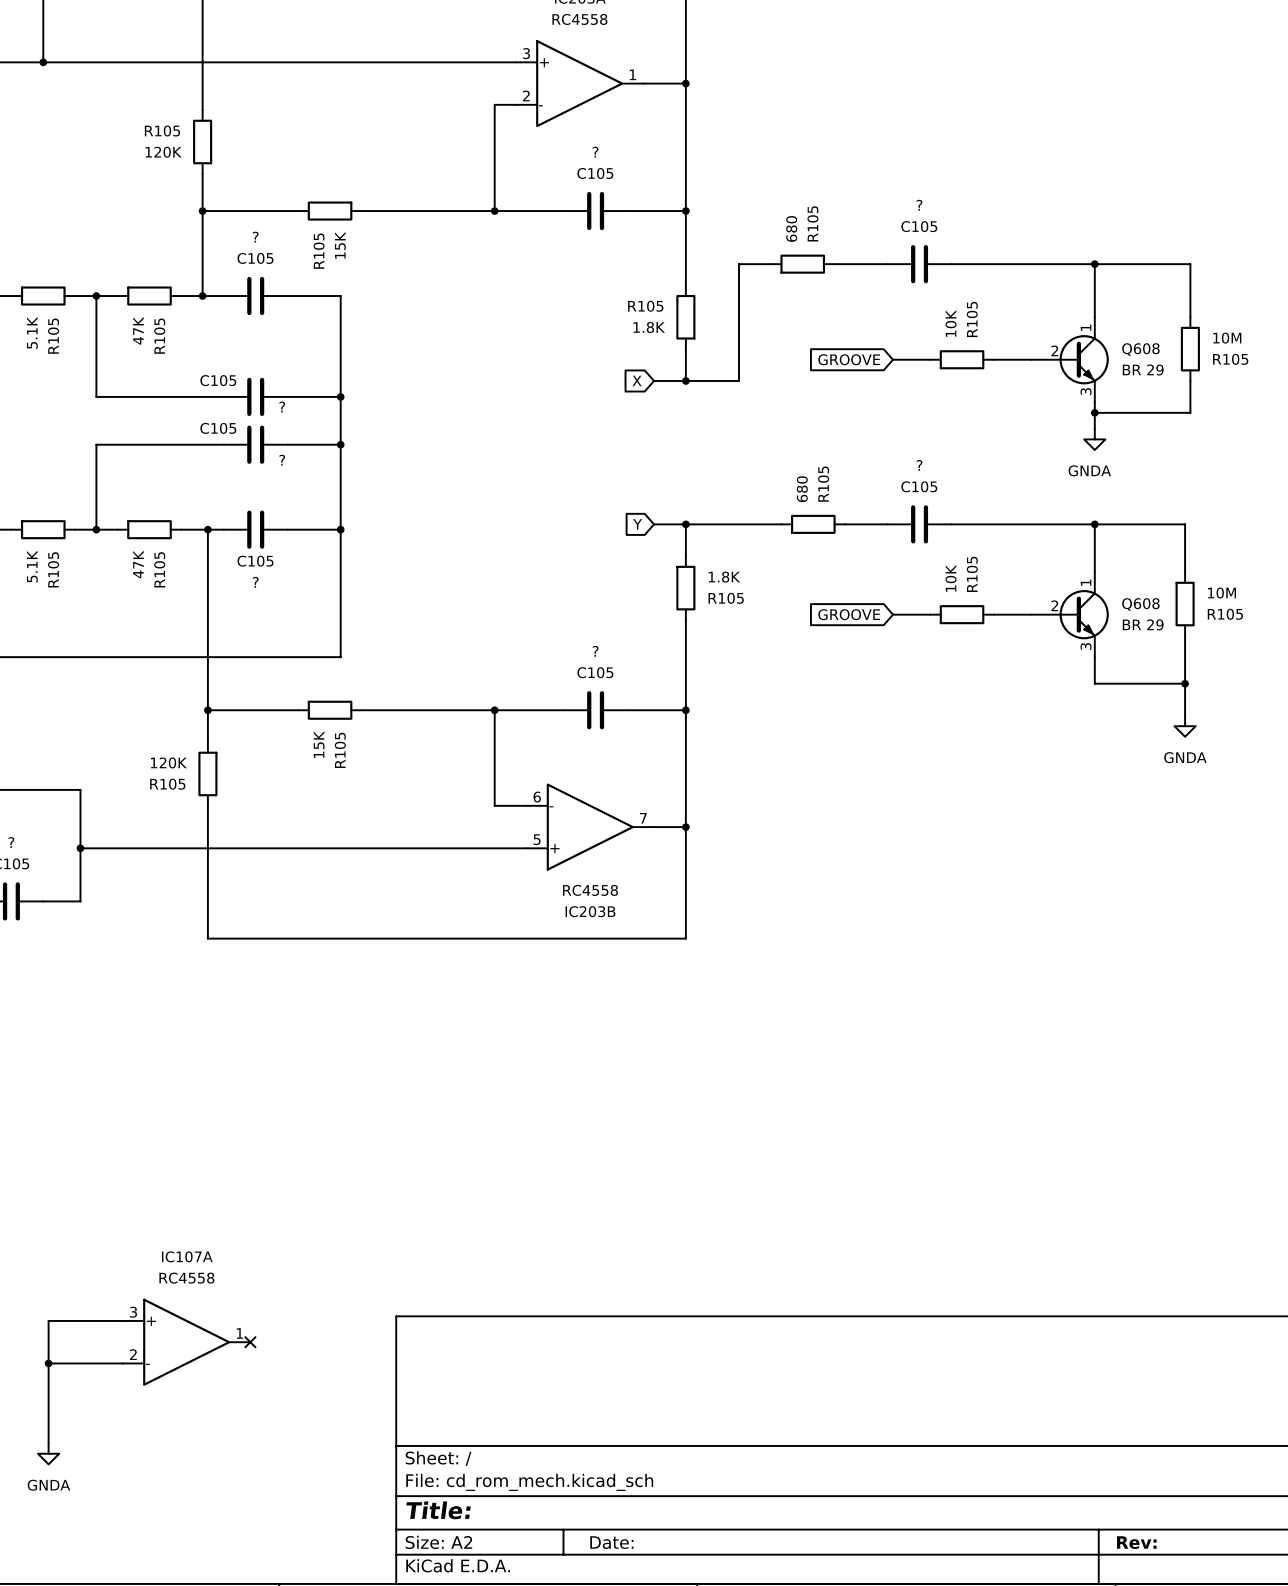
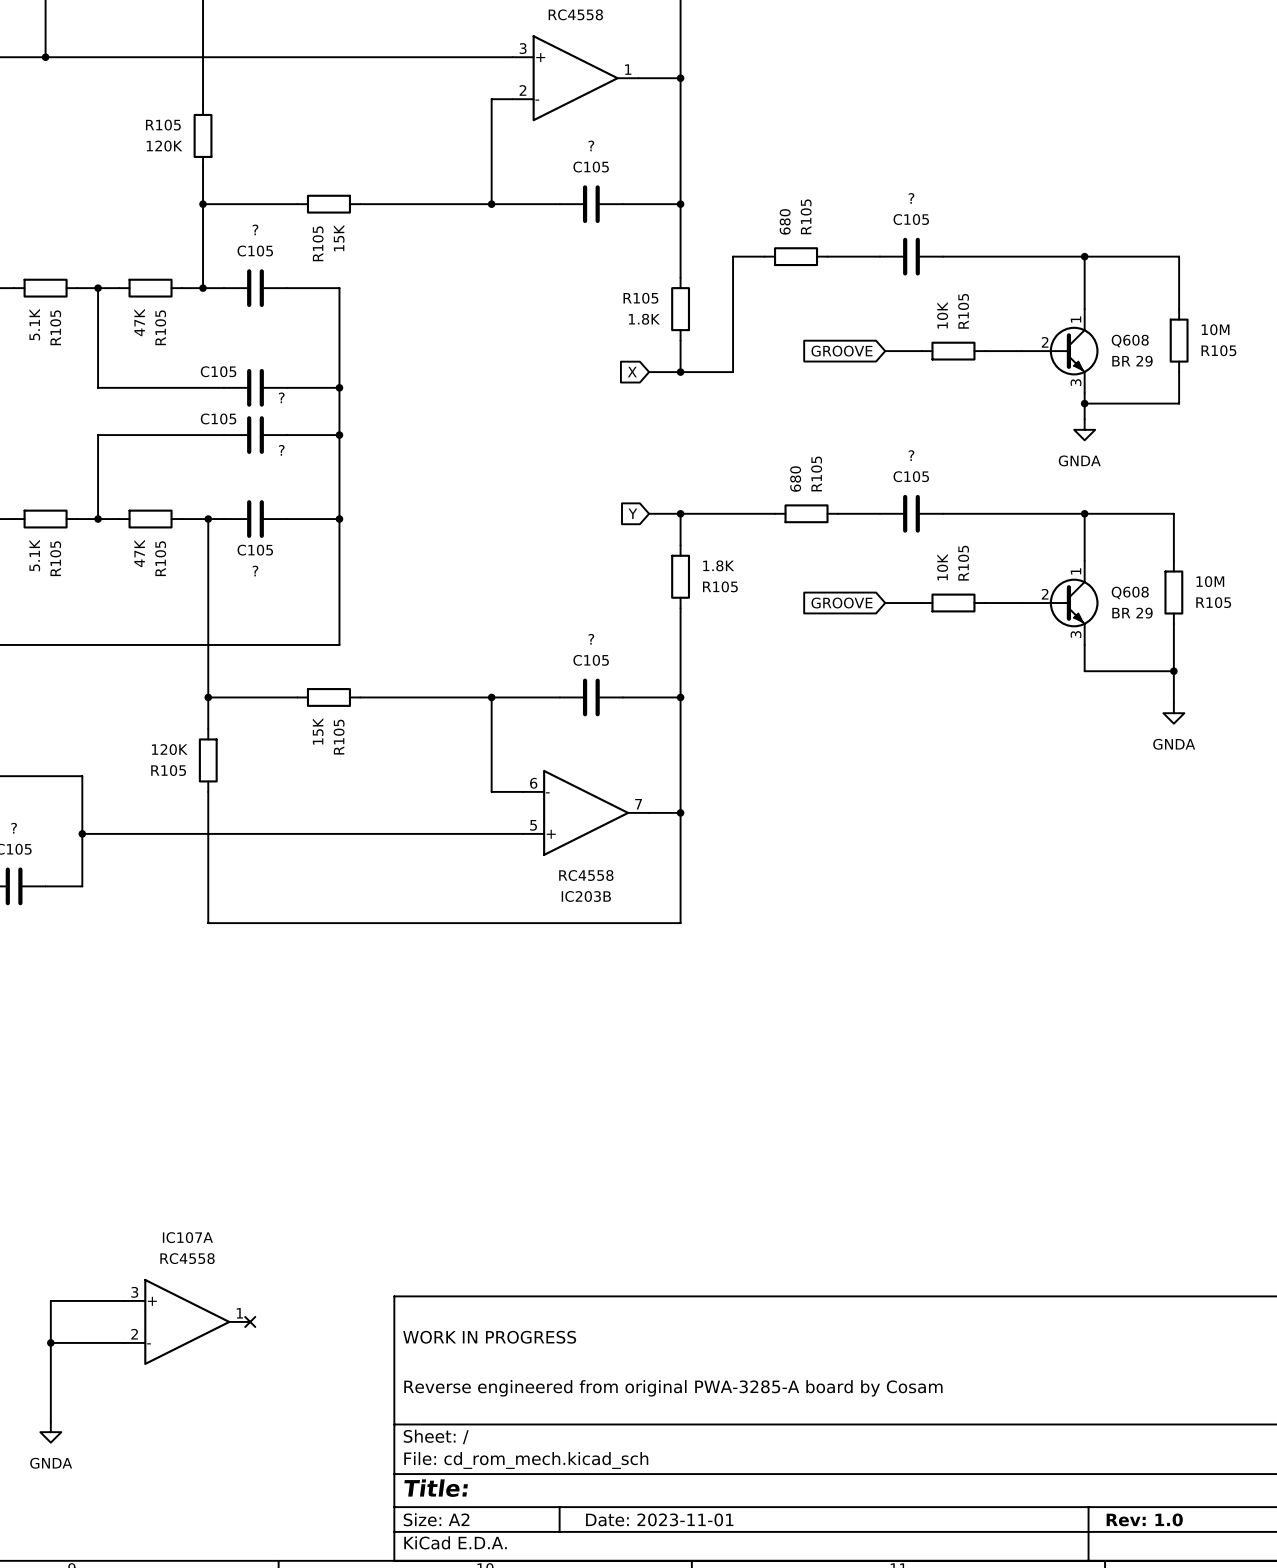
title block: none -> WORK IN PROGRESS (489, 1337)
title block: none -> Reverse engineered from original PWA-3285-A board by Cosam (673, 1388)
title block: Date: (611, 1542) -> Date: 2023-11-01 (659, 1519)
title block: Rev: (1136, 1542) -> Rev: 1.0 (1144, 1519)

